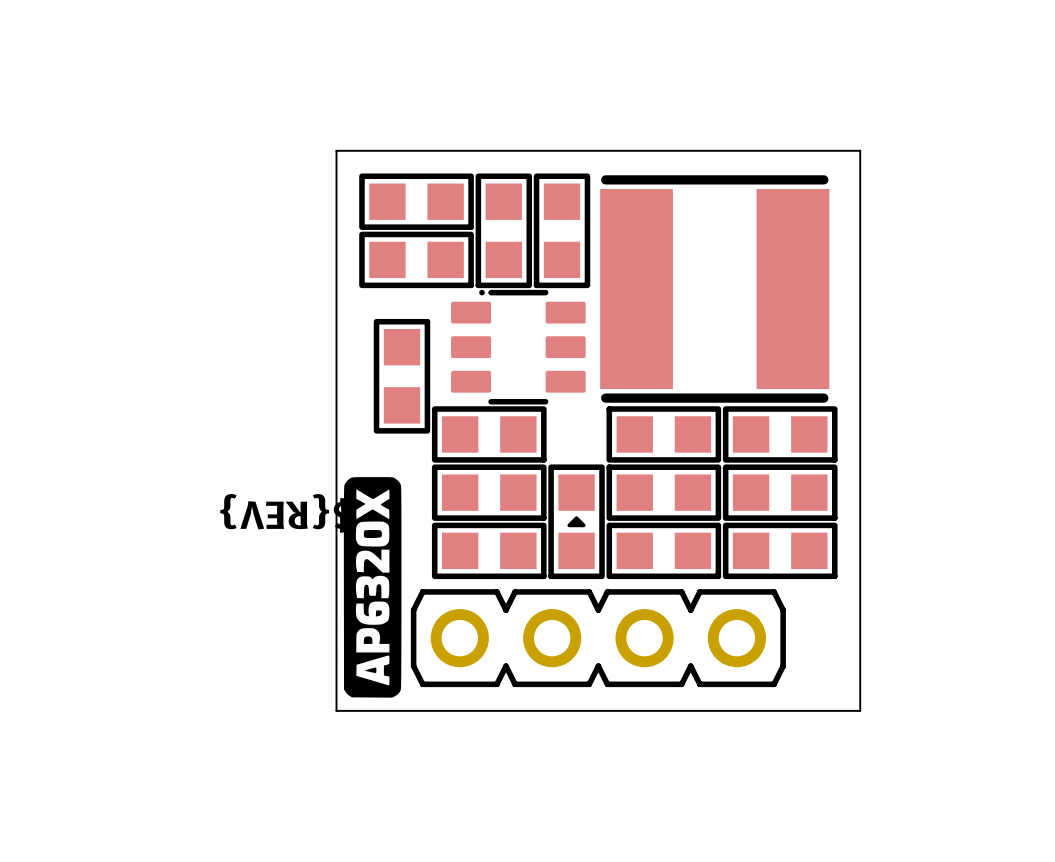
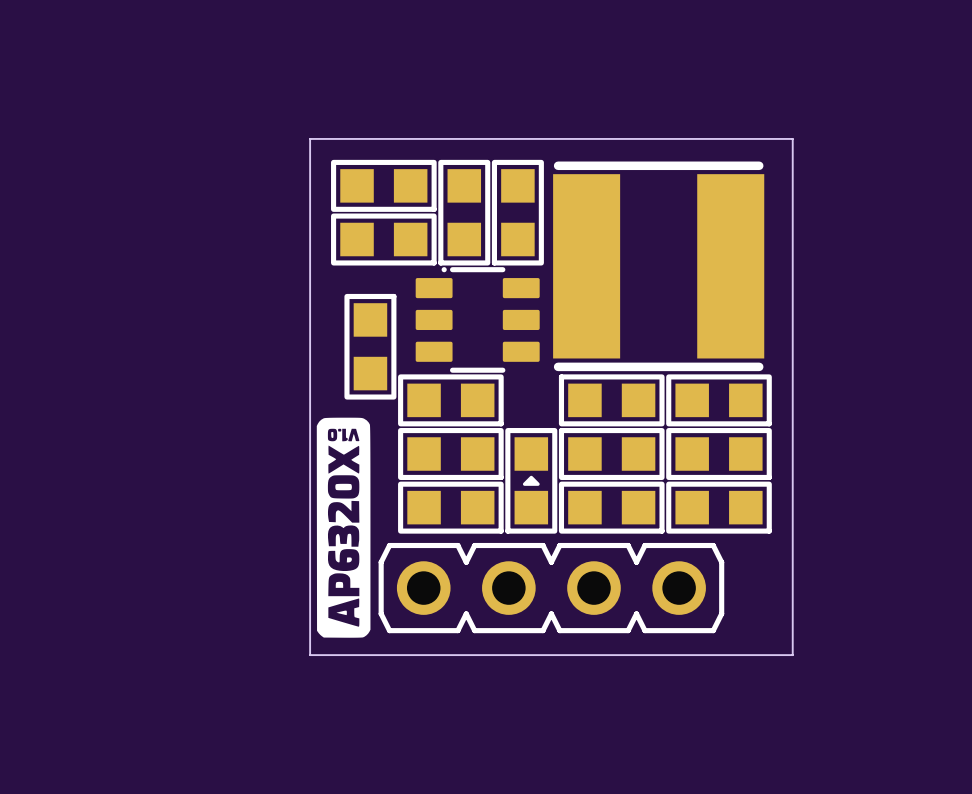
drawing shape: [343, 477, 402, 698] -> [316, 417, 371, 638]
text: ${REV} (286, 513) -> none

